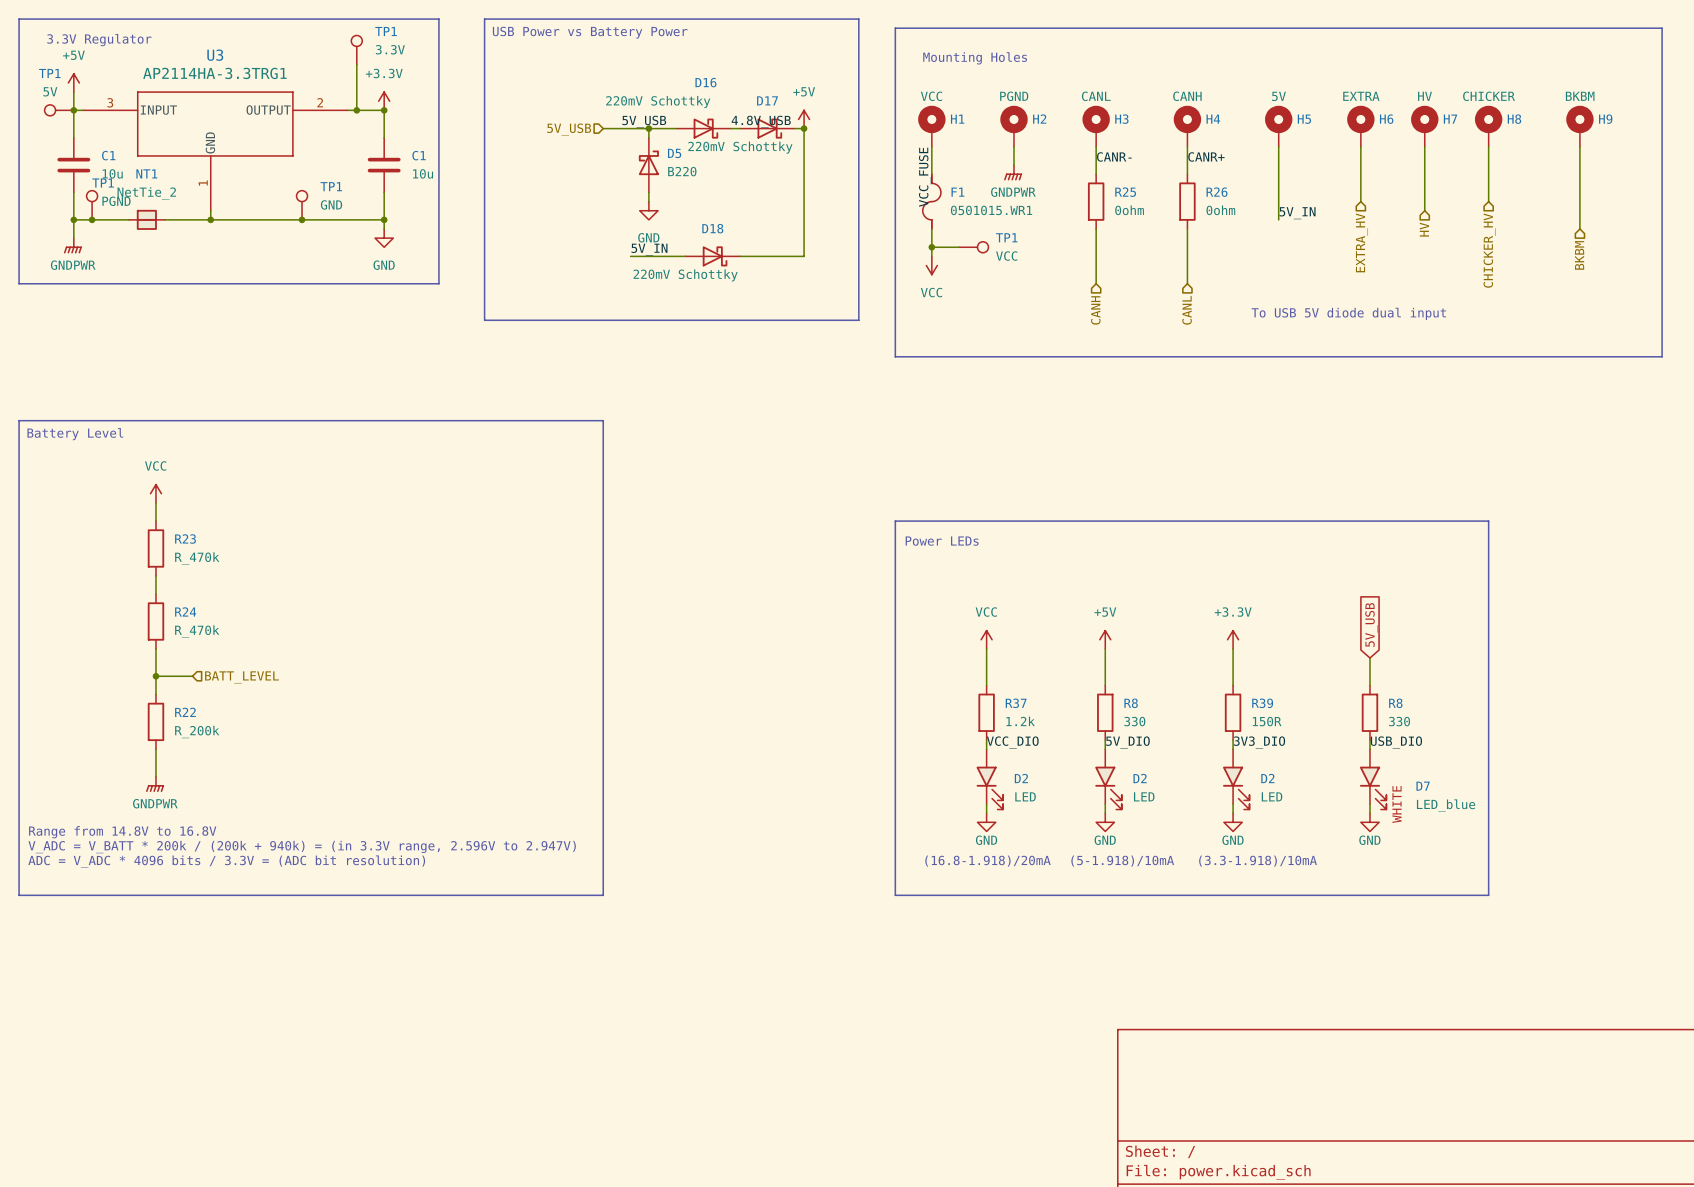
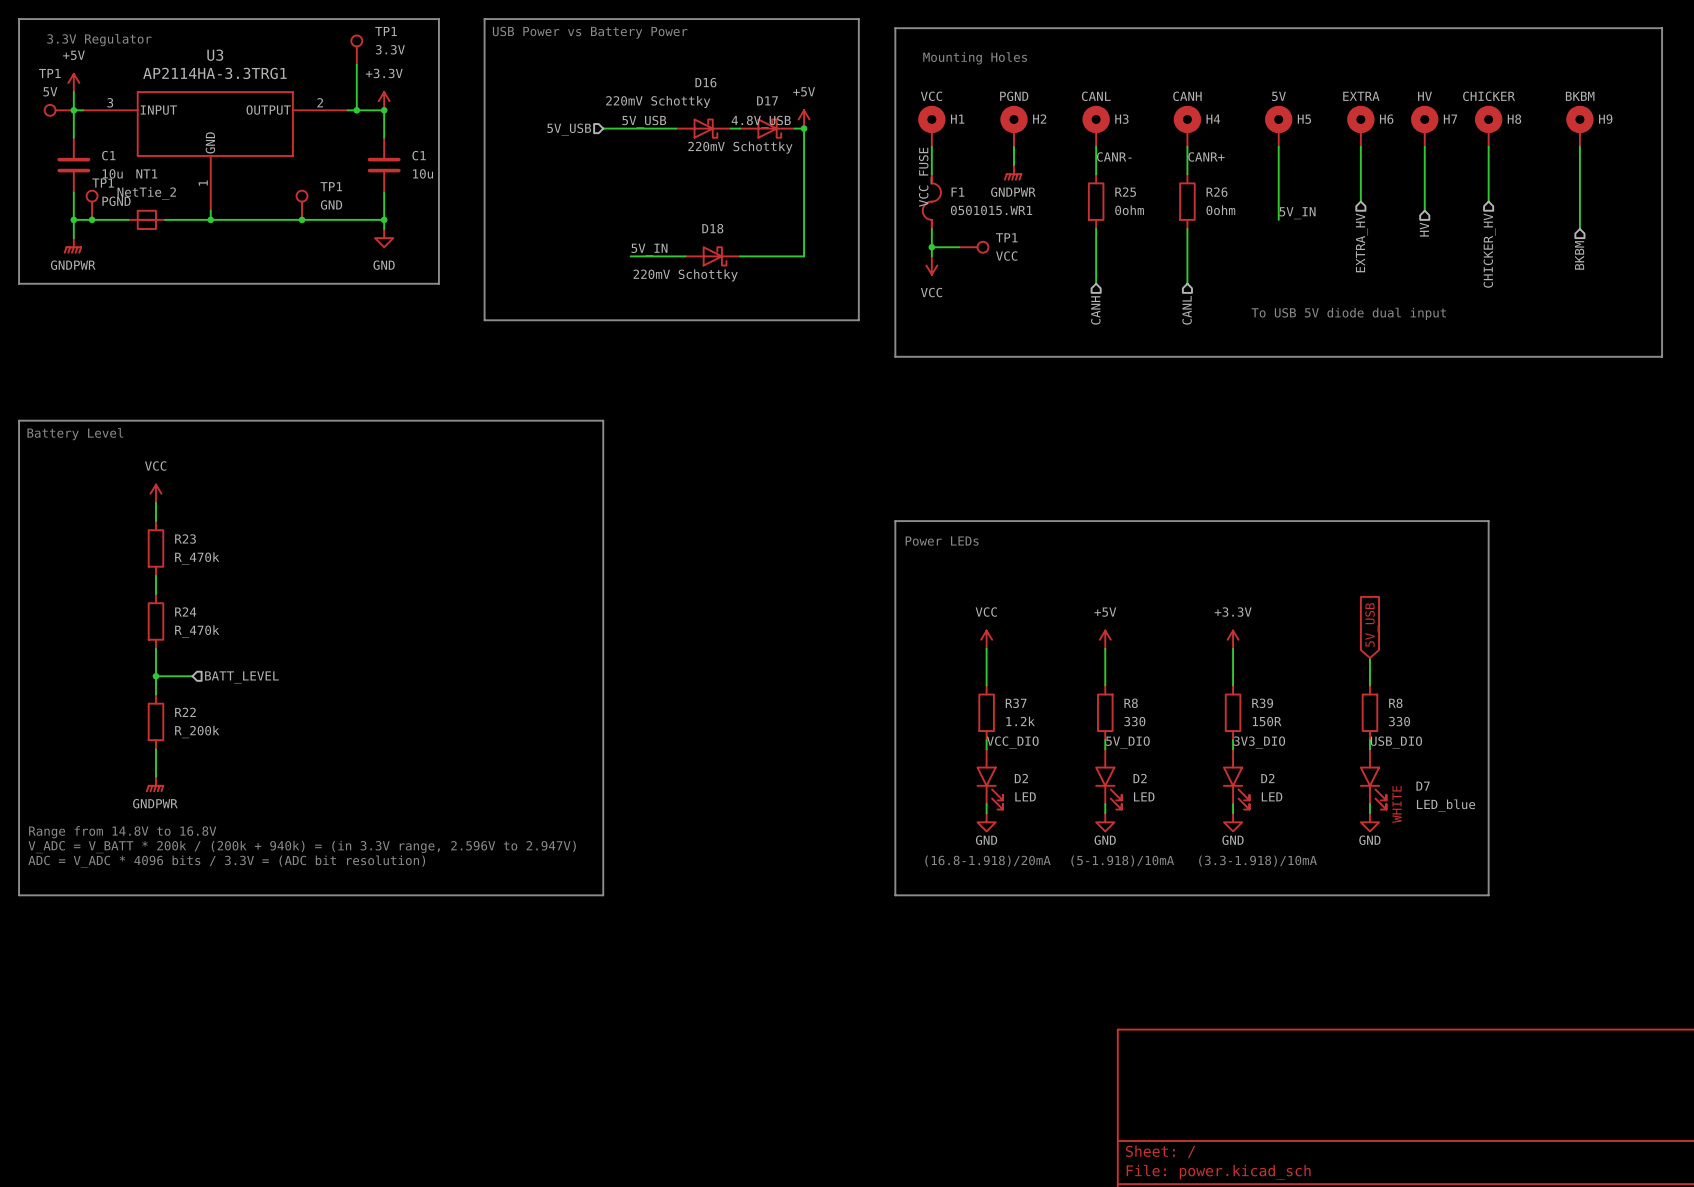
wire: (648, 128) (648, 137) -> none
junction: (648, 128) -> none
D5: B220 (648, 165) -> none
wire: (648, 192) (648, 201) -> none
power symbol: GND (648, 210) -> none

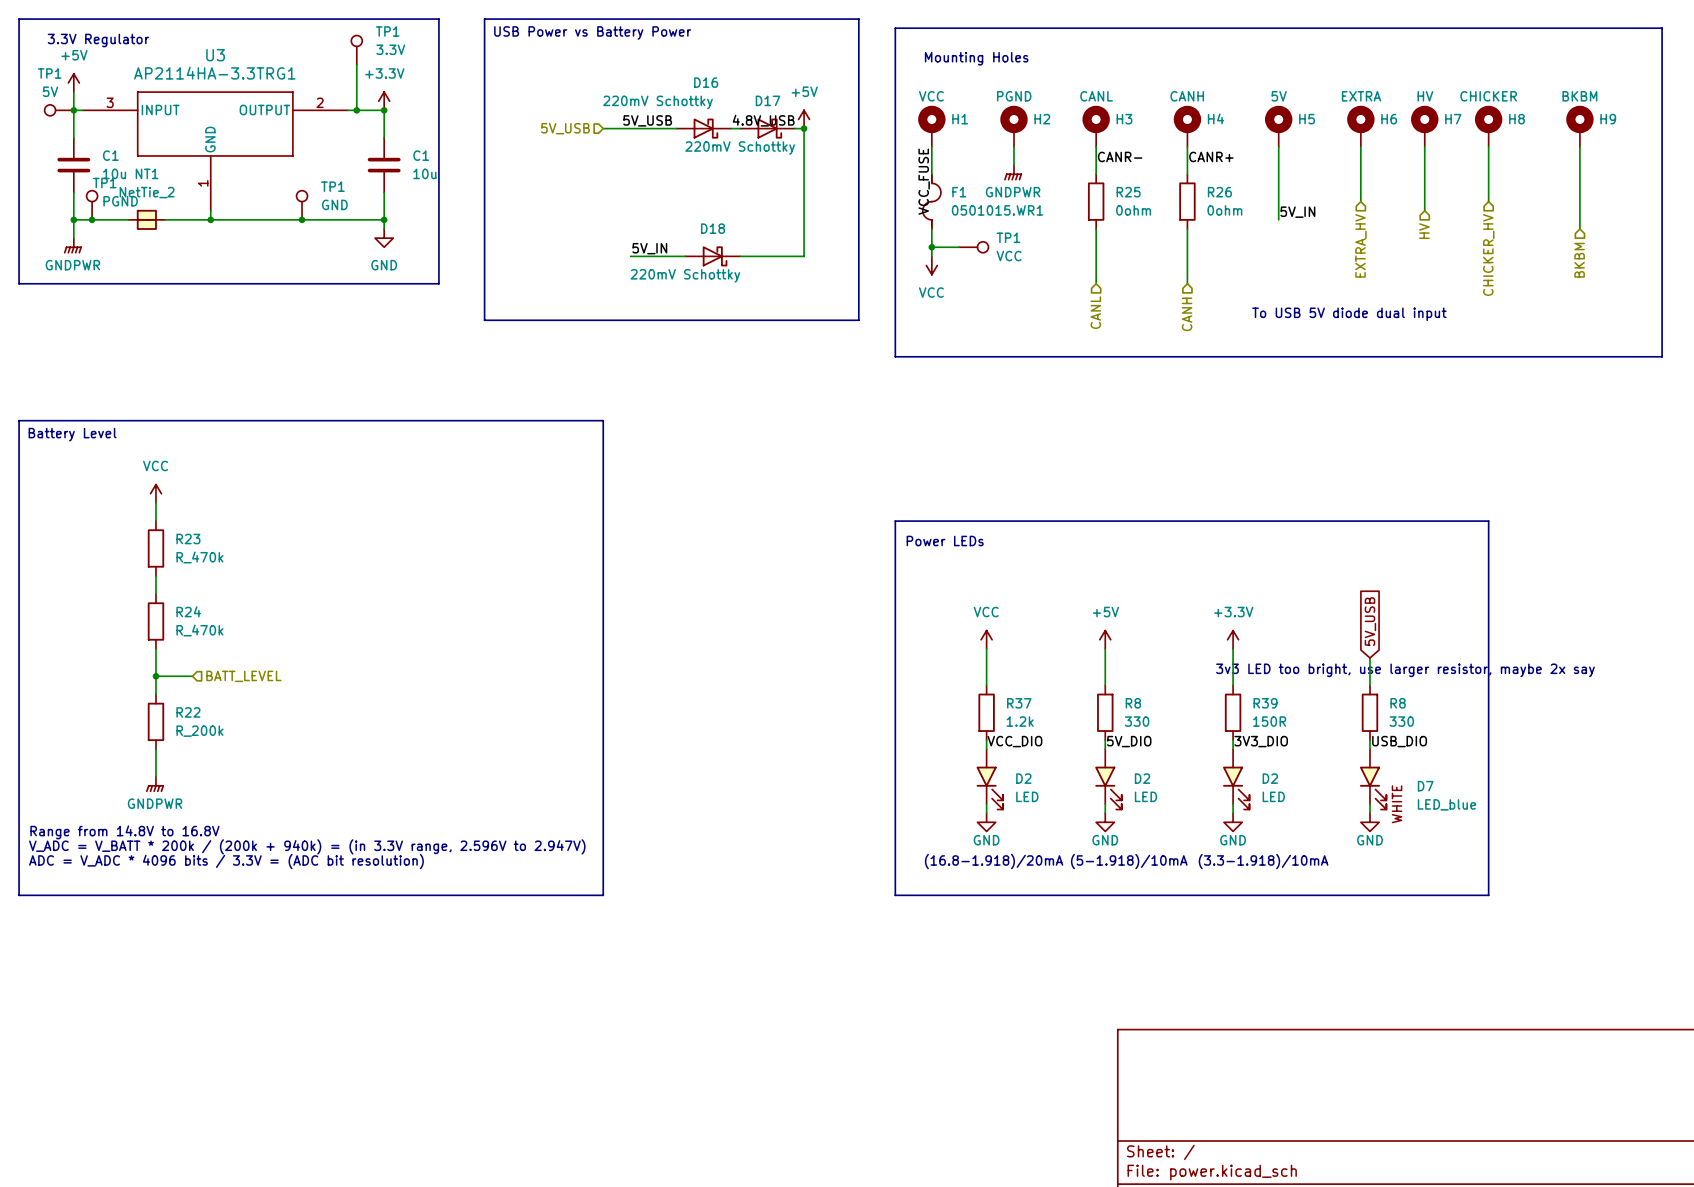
hierarchical label: CANH (1095, 310) -> CANL (1095, 312)
hierarchical label: CANL (1187, 310) -> CANH (1187, 314)
text: none -> 3v3 LED too bright, use larger resistor, maybe 2x say (1405, 670)

